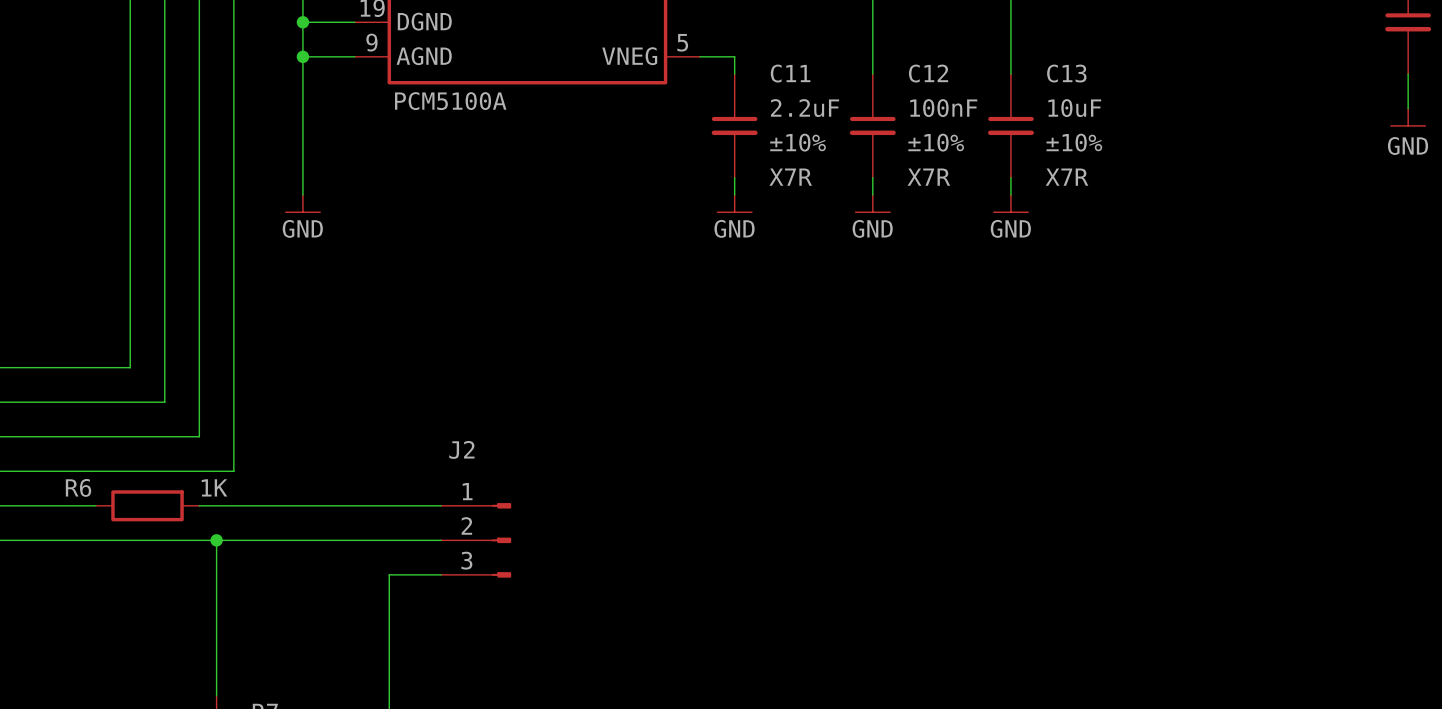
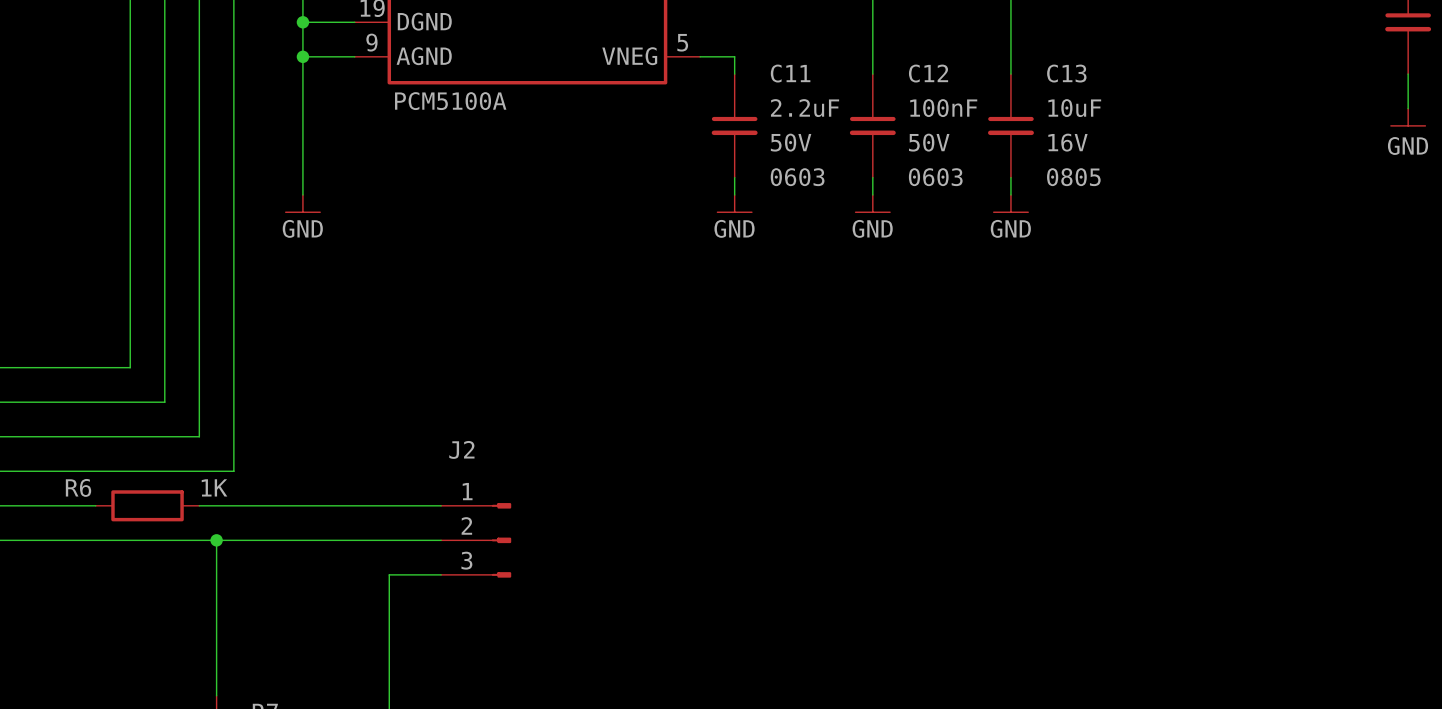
C11 text: none -> 50V (791, 142)
C11 text: ±10% (798, 142) -> none
C12 text: none -> 50V (929, 142)
C12 text: ±10% (936, 142) -> none
C13 text: none -> 16V (1067, 142)
C13 text: ±10% (1074, 142) -> none
C11 text: X7R (790, 177) -> none
C11 text: none -> 0603 (797, 177)
C12 text: X7R (928, 177) -> none
C12 text: none -> 0603 (935, 177)
C13 text: X7R (1066, 177) -> none
C13 text: none -> 0805 (1073, 177)

